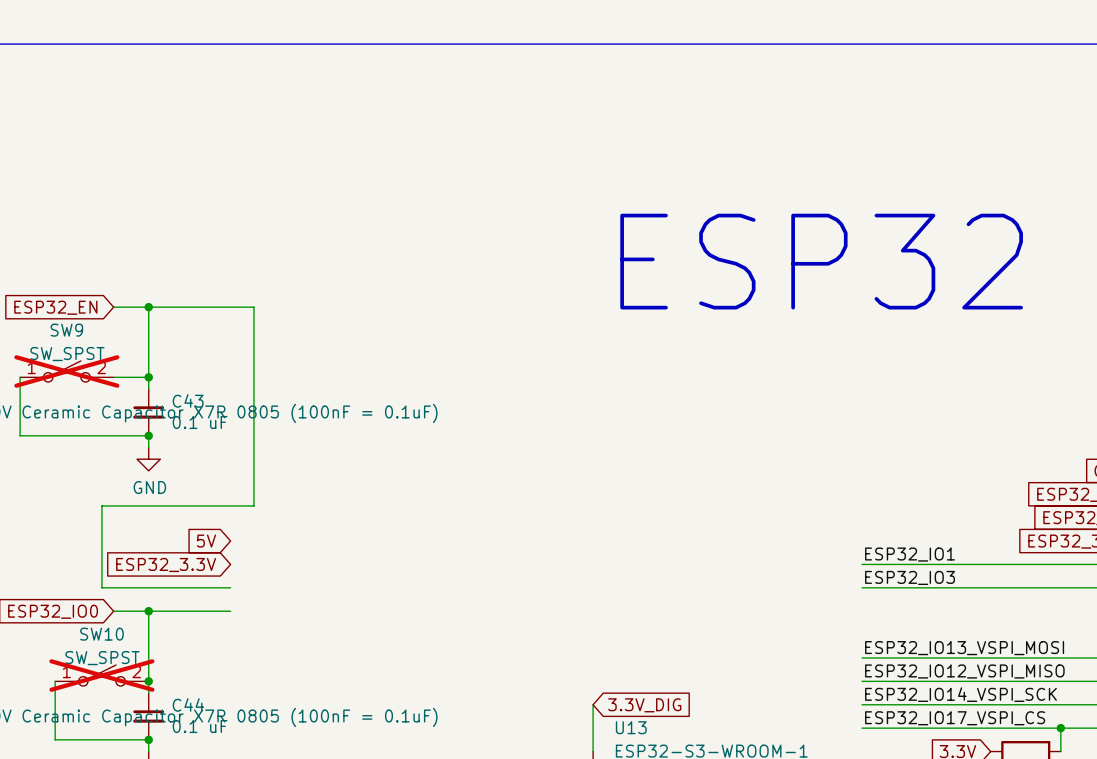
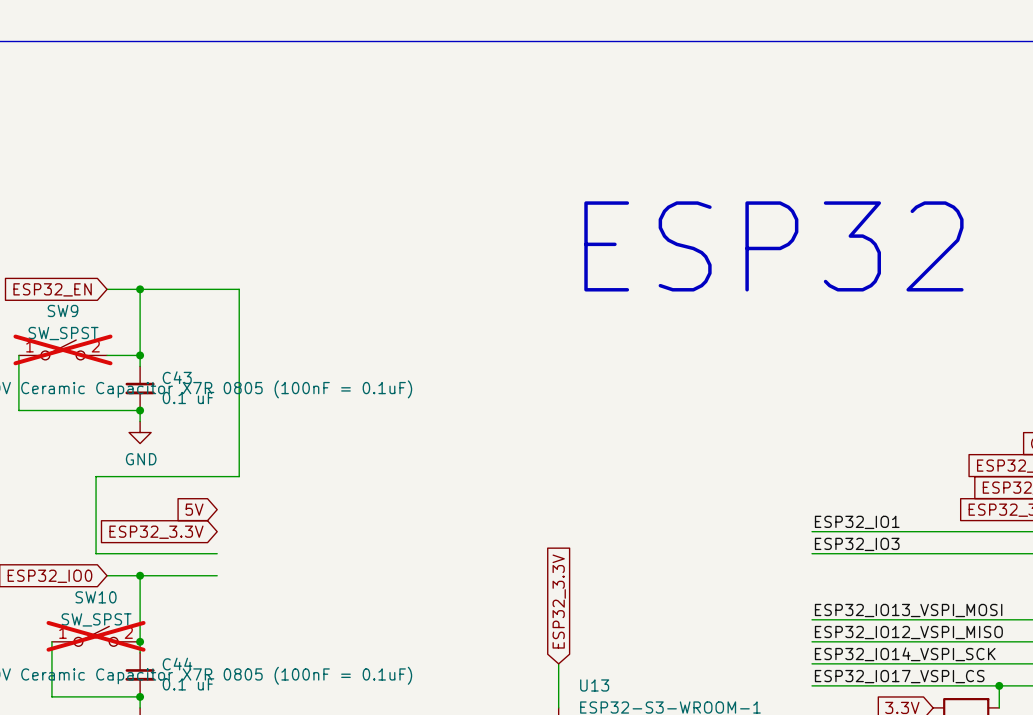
global label: 3.3V_DIG (644, 705) -> ESP32_3.3V (559, 601)

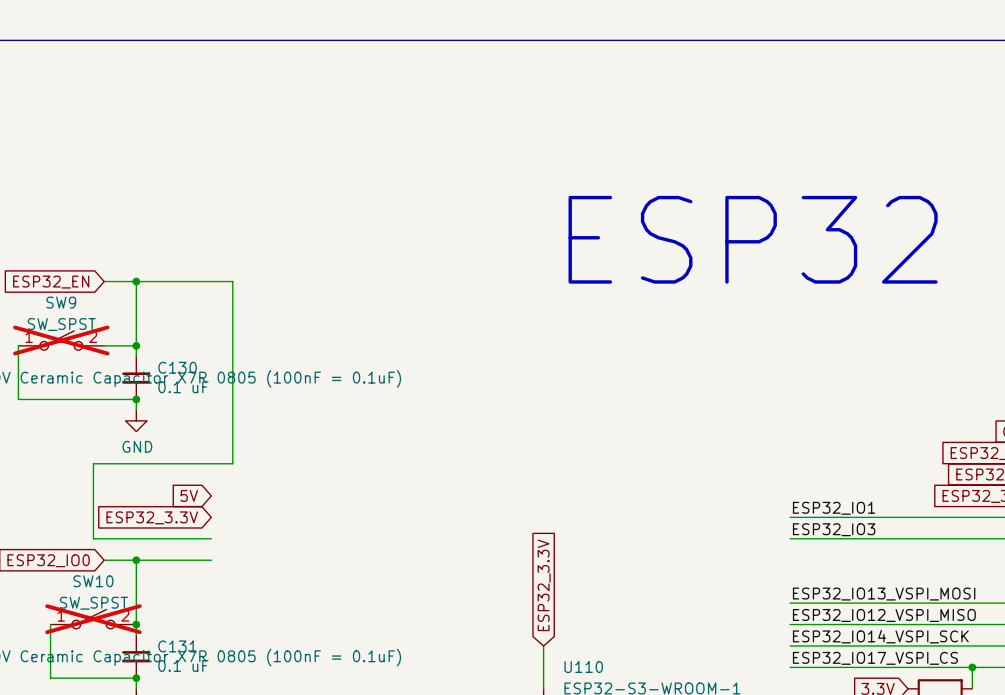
C43 name: C43 (177, 377) -> C130 (177, 367)
C44 name: C44 (177, 664) -> C131 (177, 646)
U13 name: U13 (594, 685) -> U110 (583, 667)

